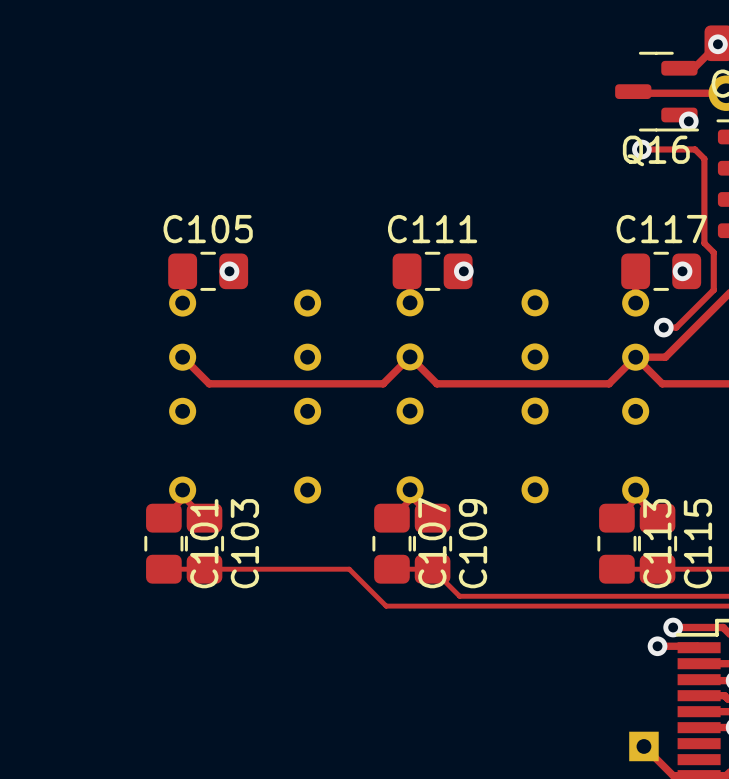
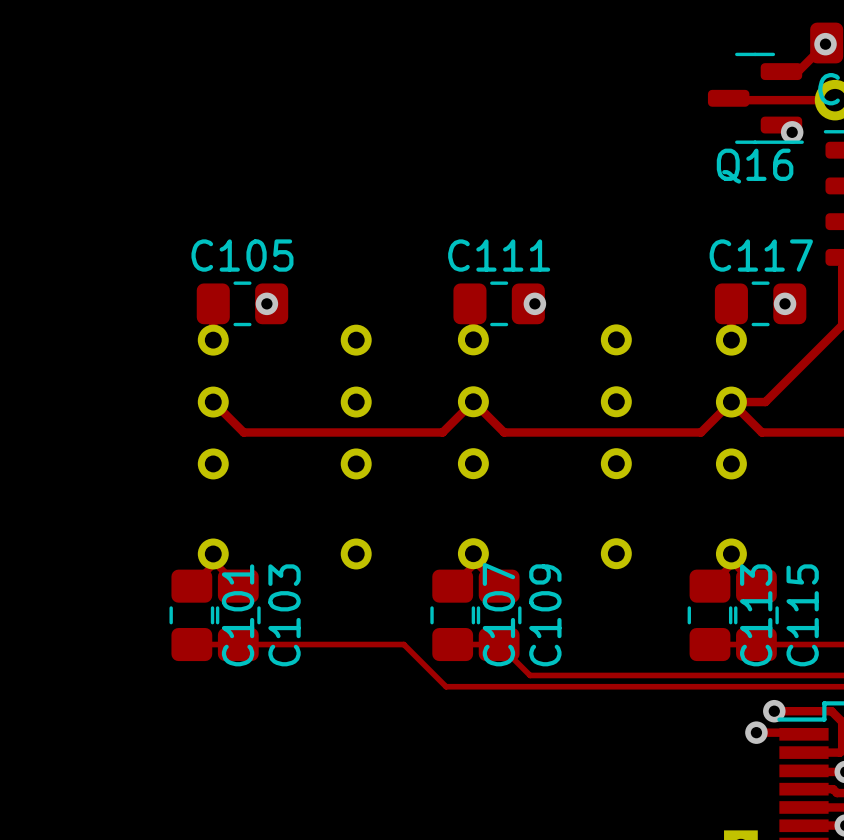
track: (641, 149) (695, 149) (704, 158) (704, 243) (713, 252) (713, 290) (676, 327) (663, 327) -> none
via: (641, 149) -> none
via: (663, 327) -> none

